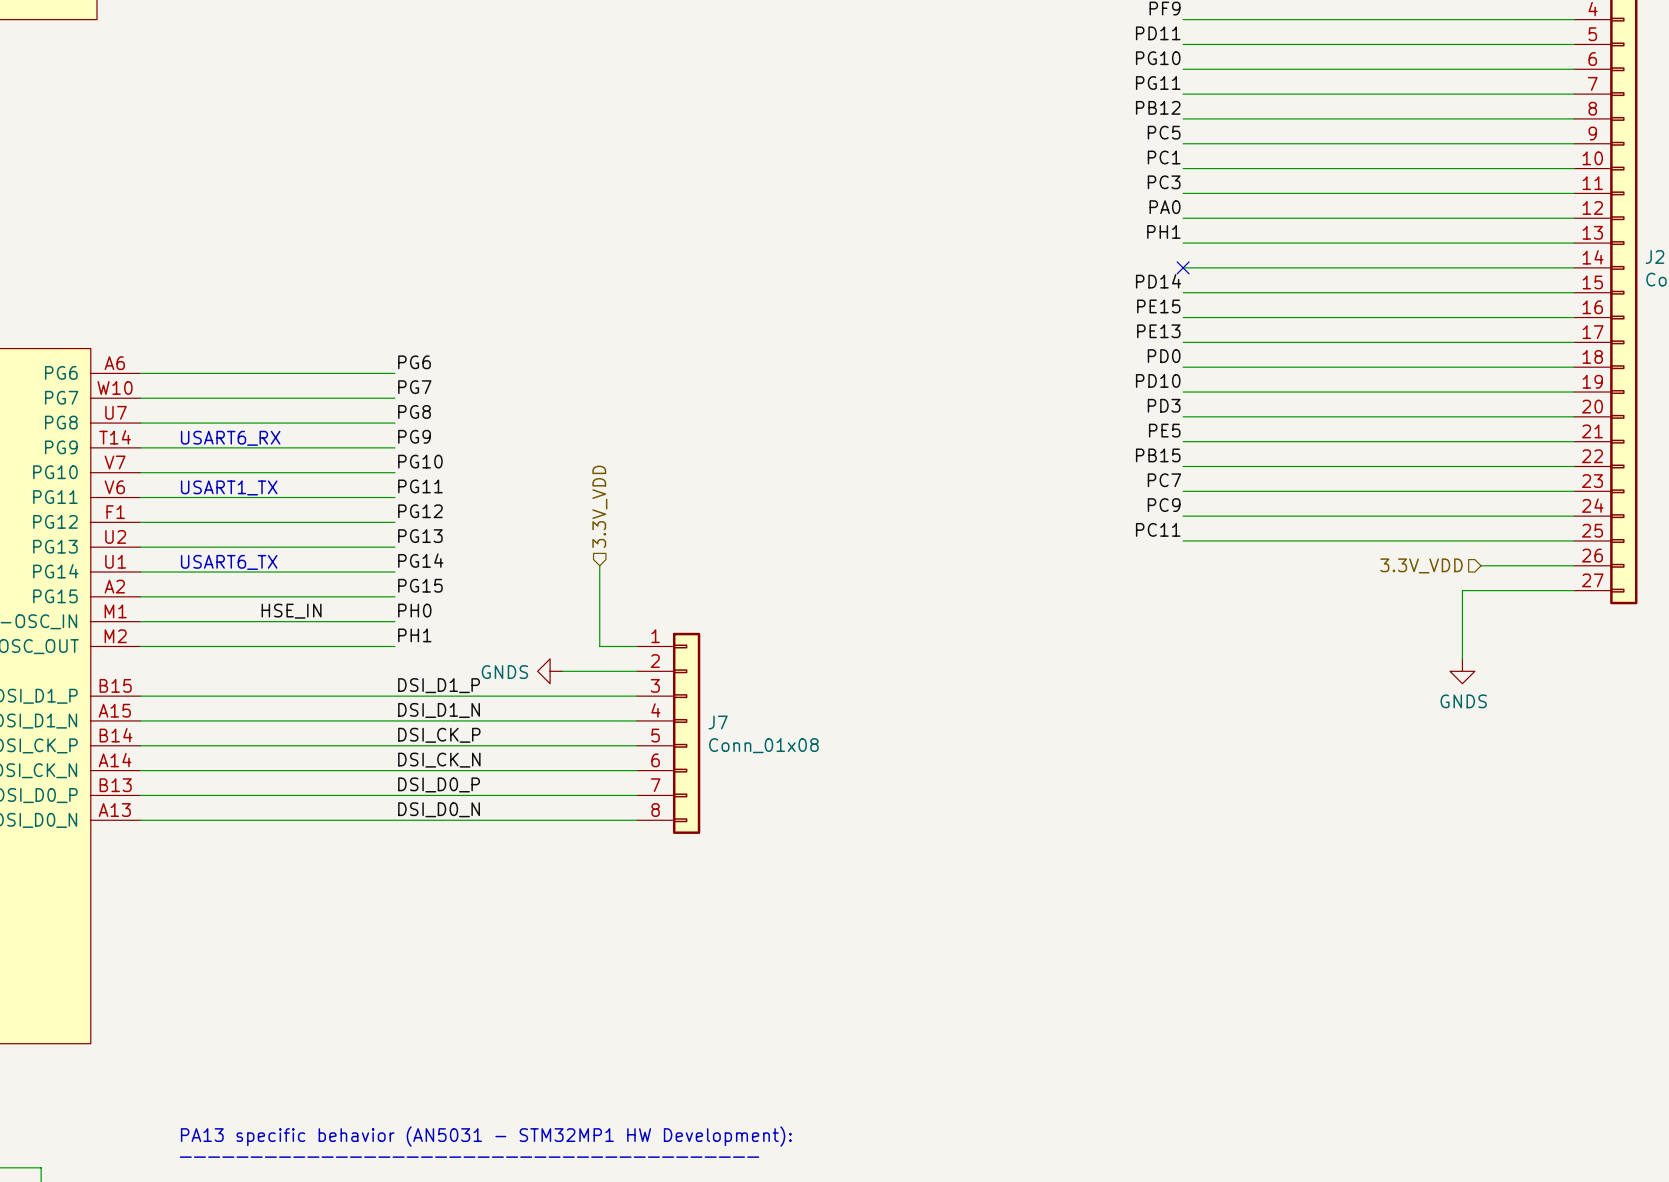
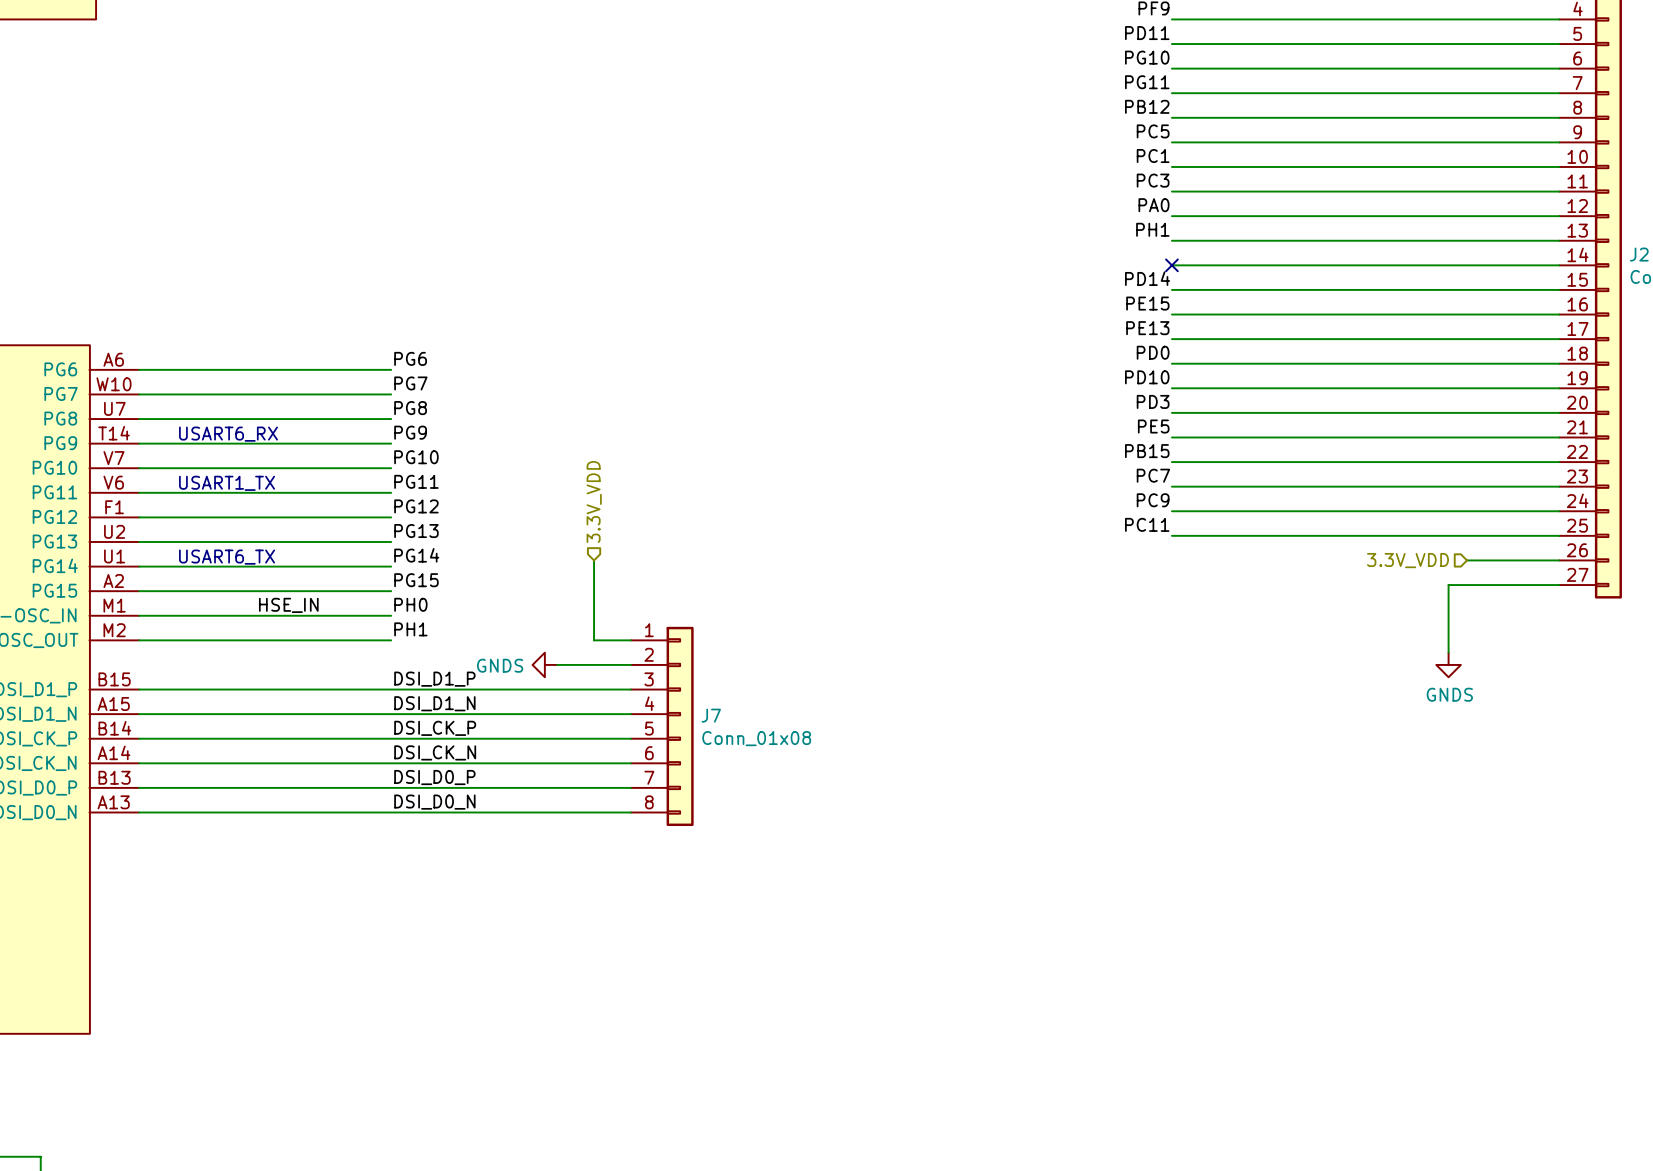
text: PA13 specific behavior (AN5031 - STM32MP1 HW Development): (486, 1136) -> none
text: ————————————————————————————————————————— (469, 1157) -> none

